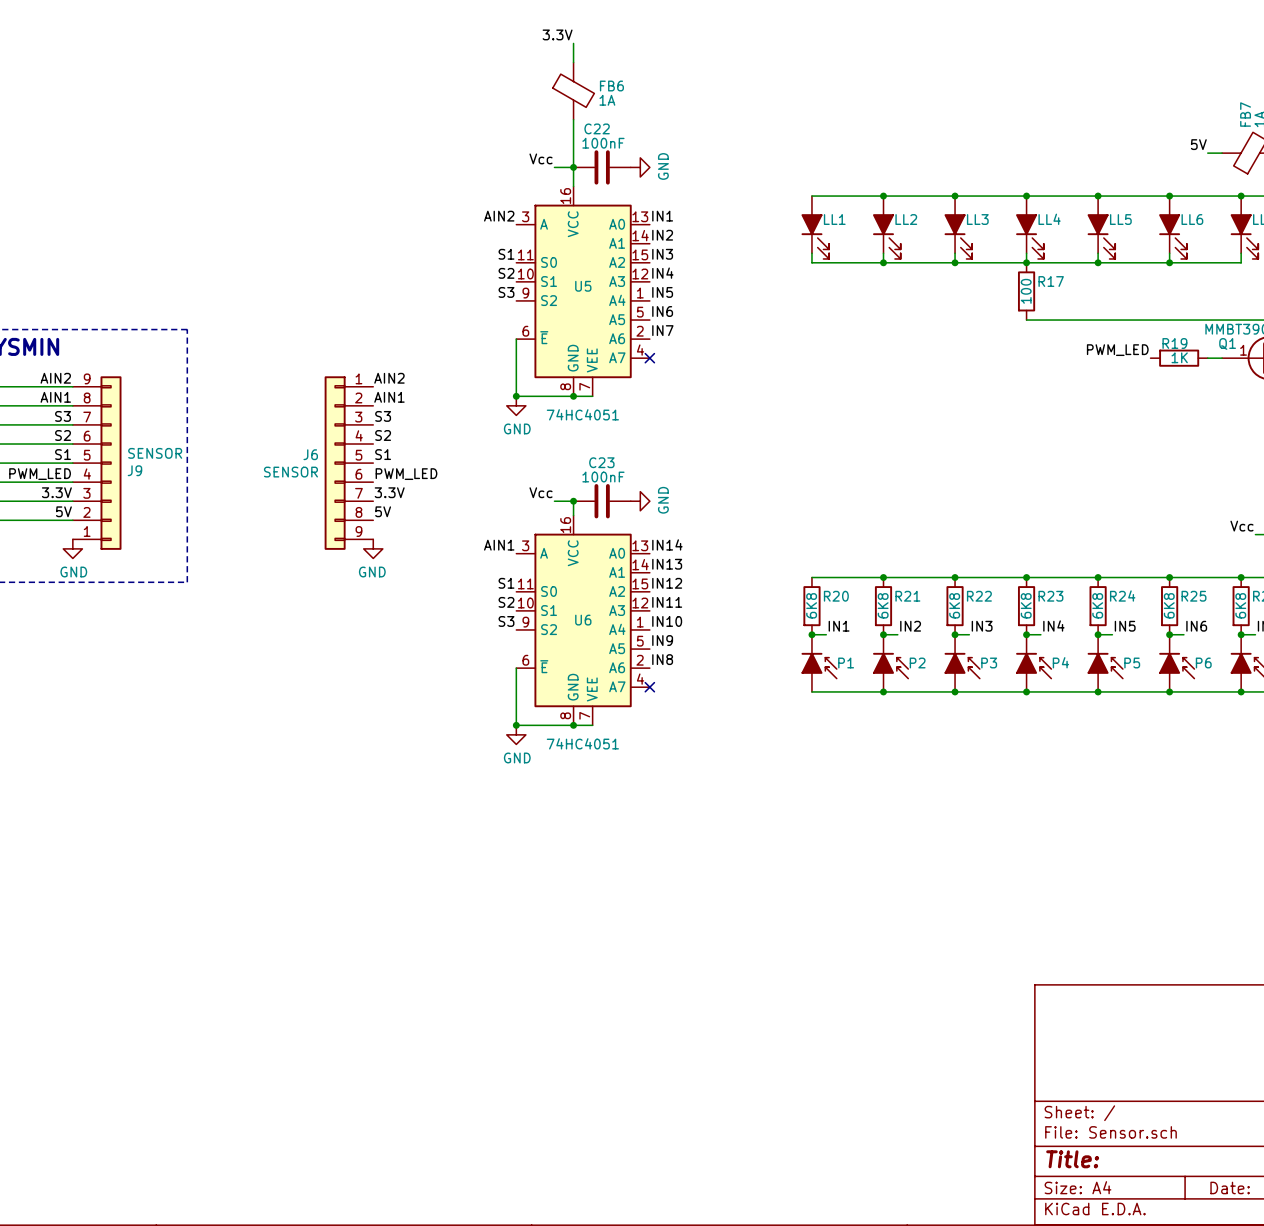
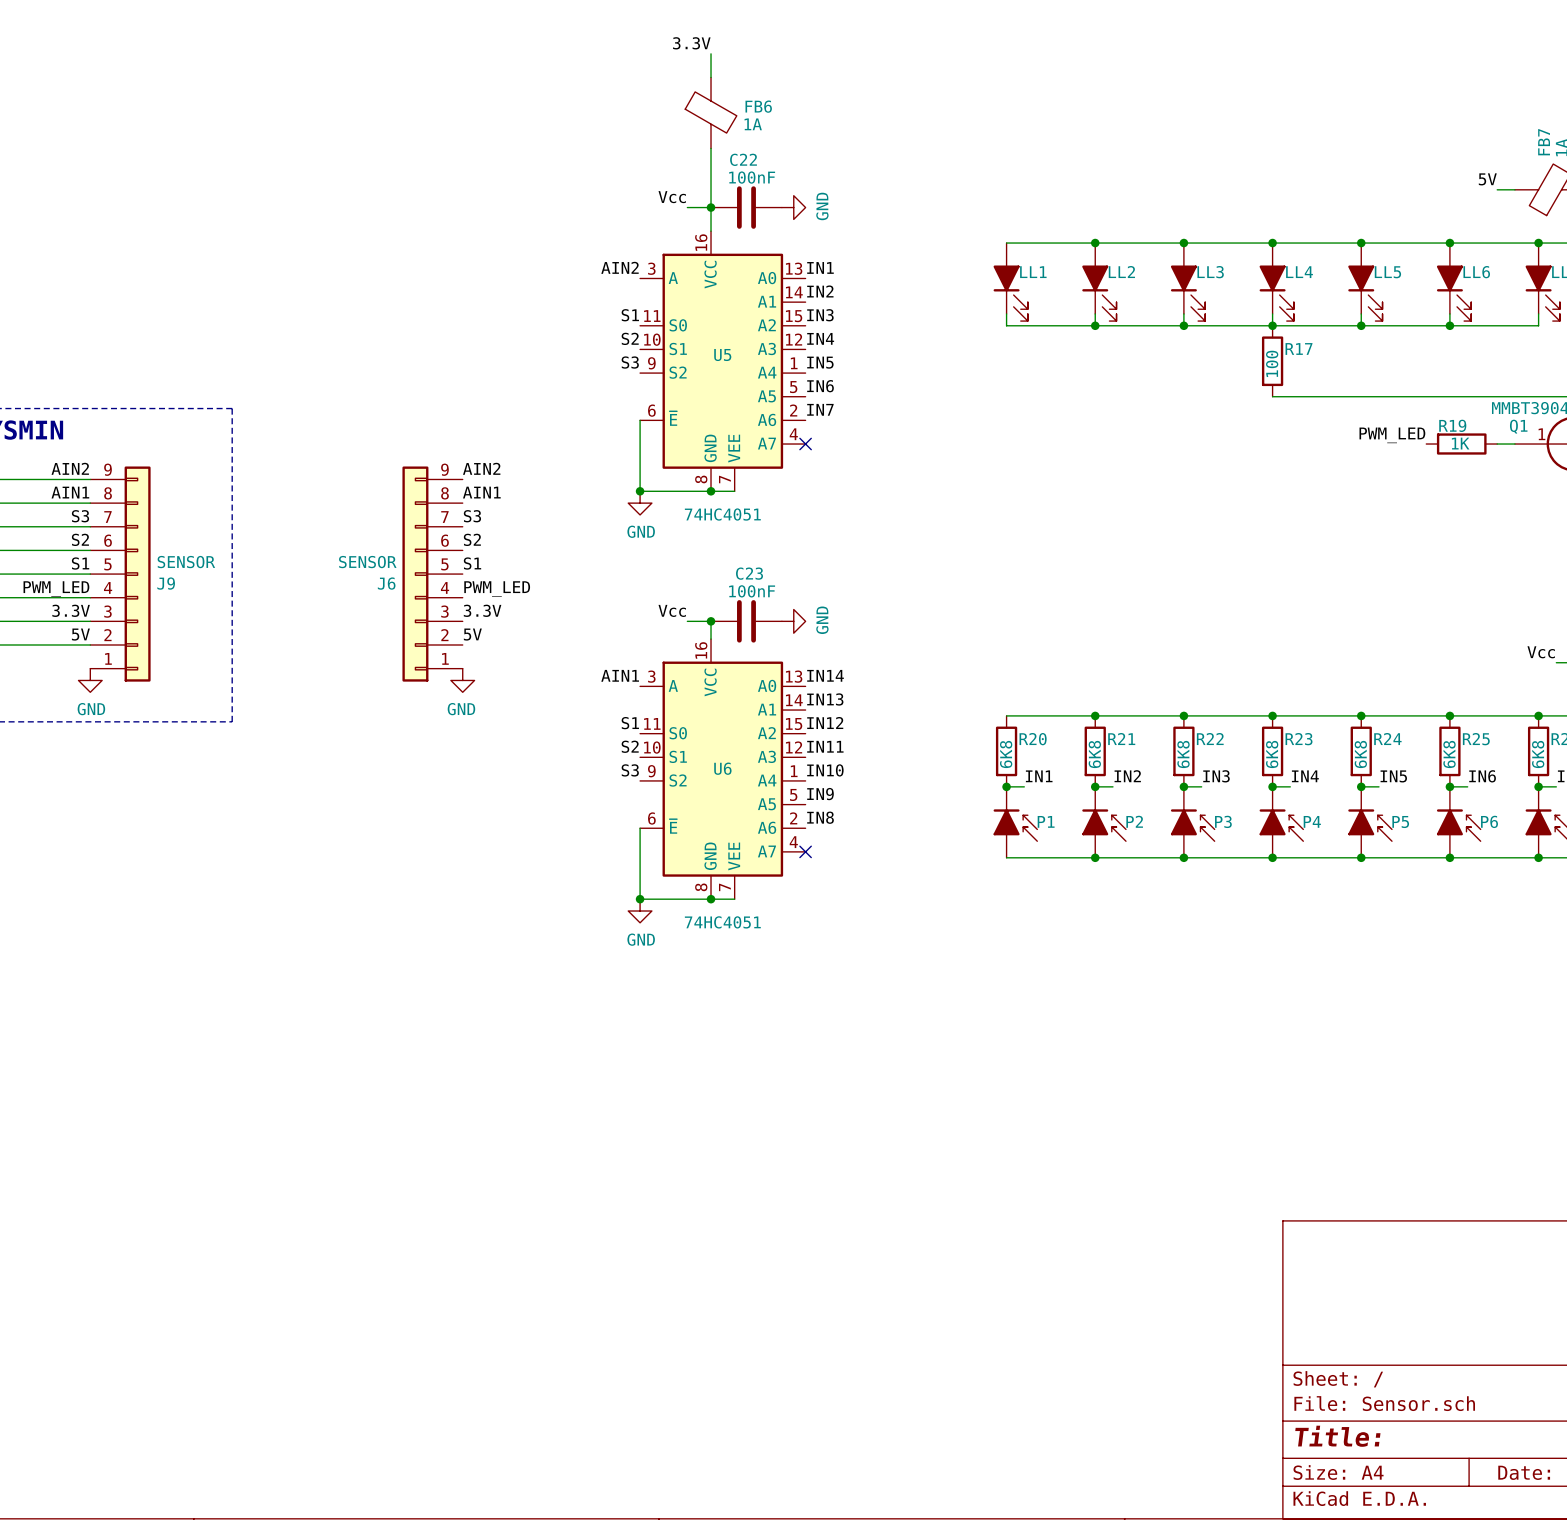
J6 flip: as is (335, 463) -> up-down (415, 574)

